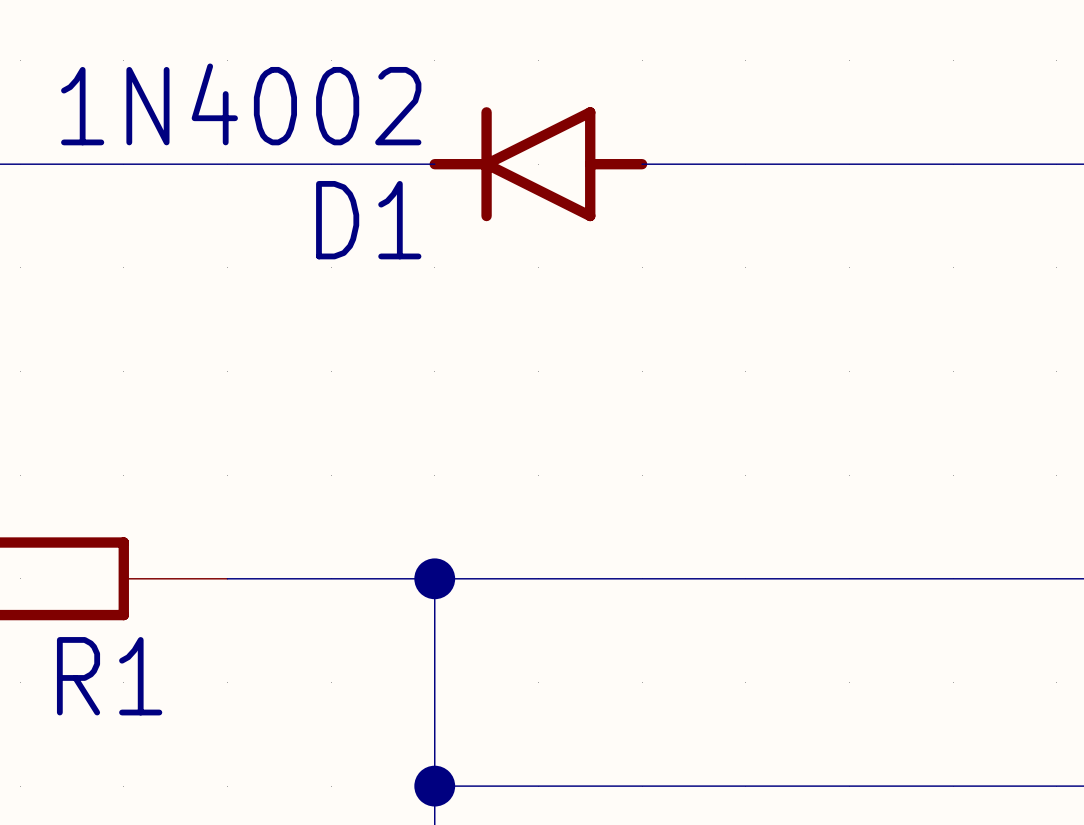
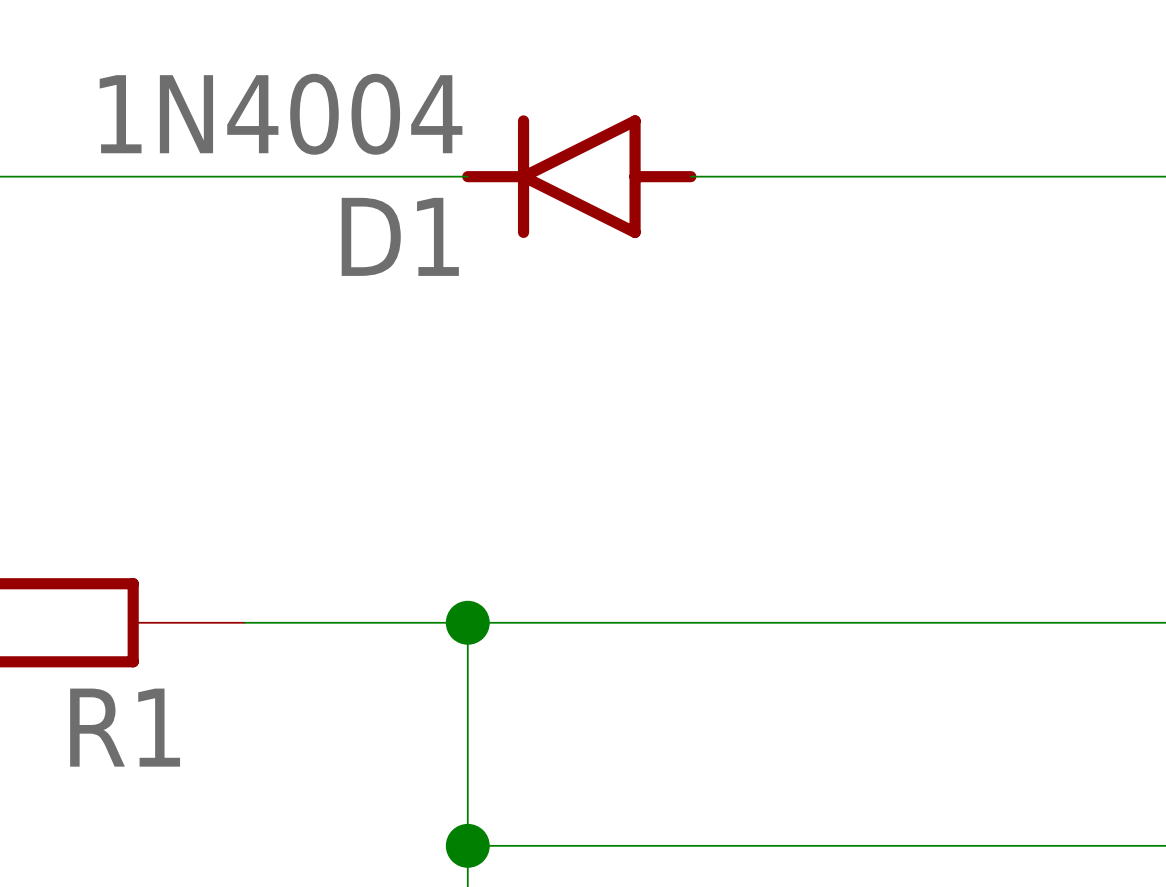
D1 value: 1N4002 (241, 104) -> 1N4004 (281, 114)

